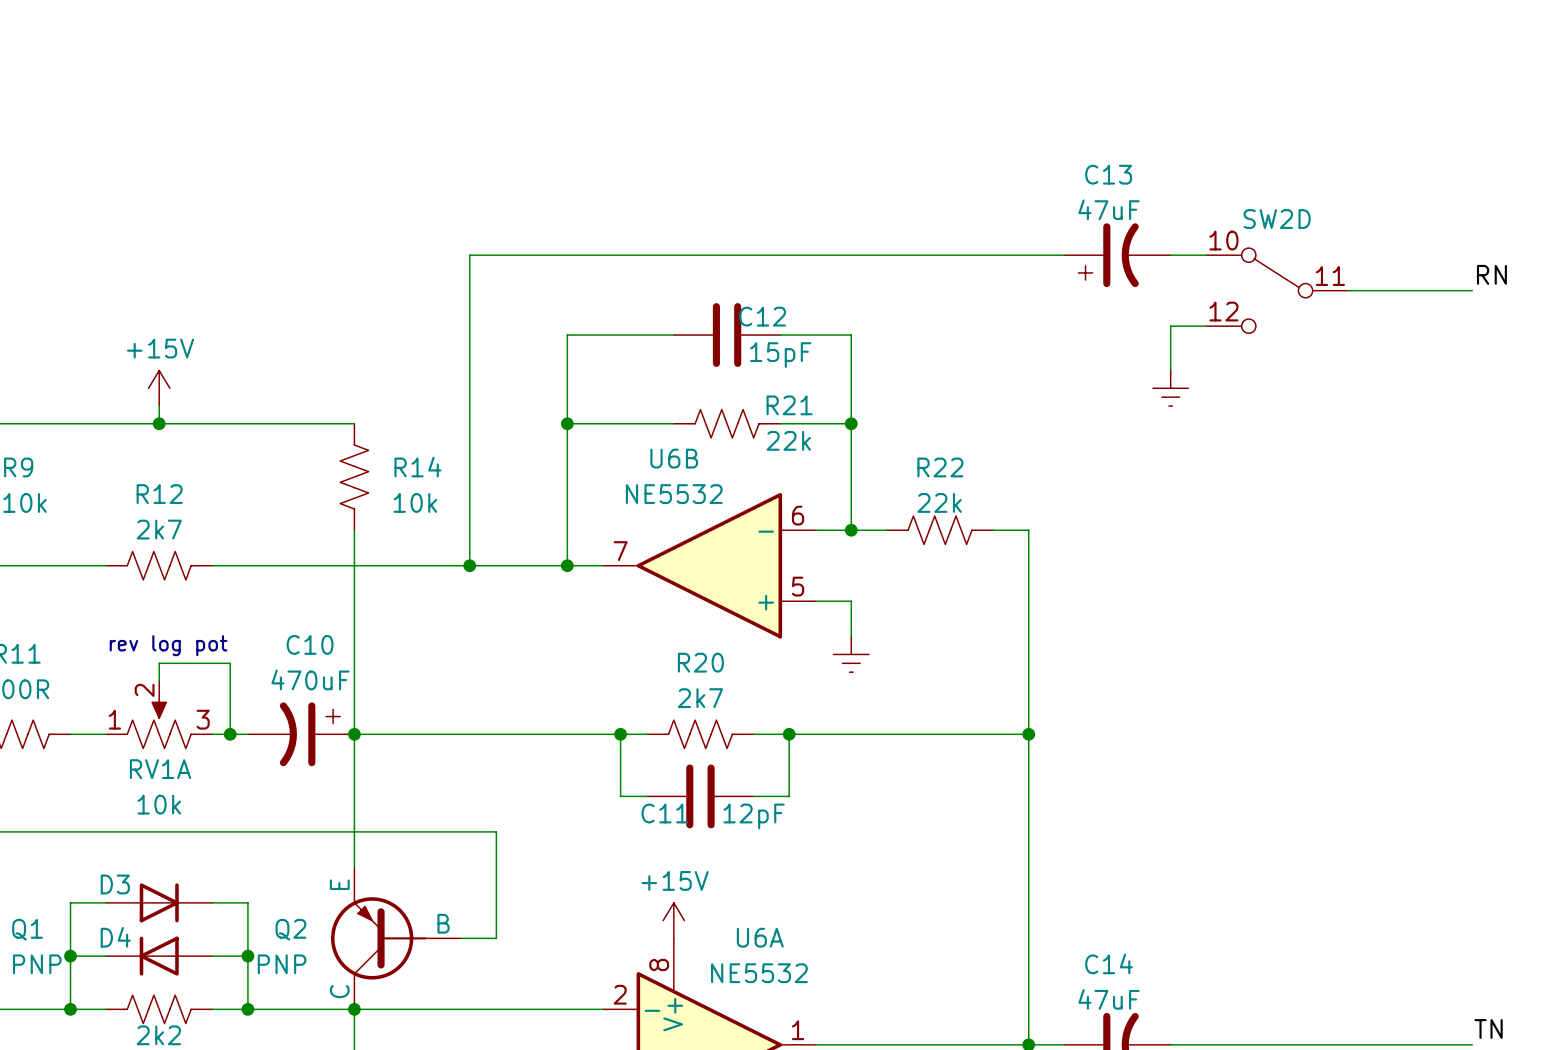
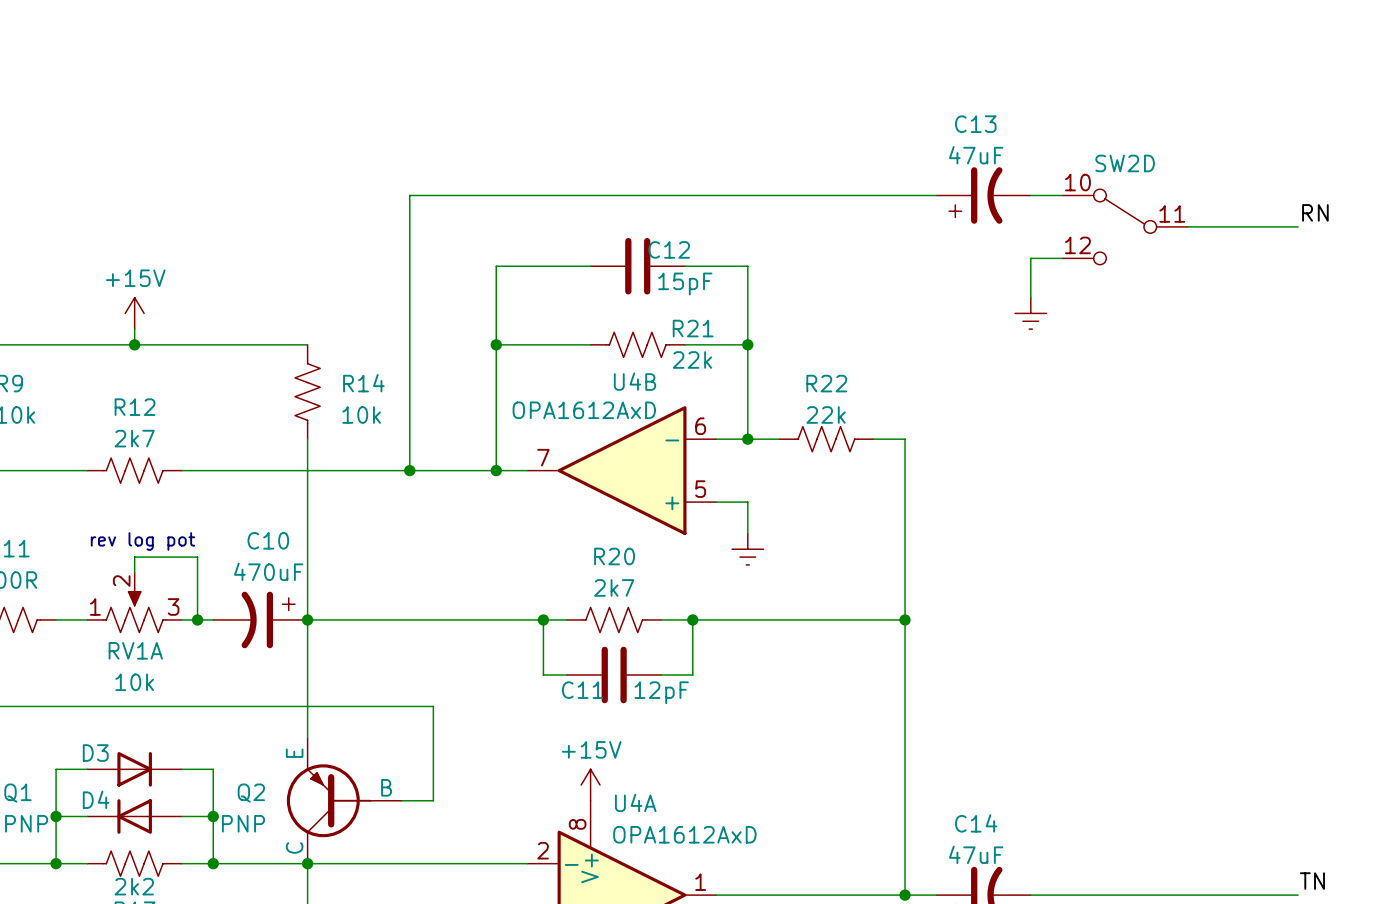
U6B name: U6B (674, 458) -> U4B (634, 381)
U6B value: NE5532 (674, 494) -> OPA1612AxD (584, 410)
U6A name: U6A (760, 937) -> U4A (635, 802)
U6A value: NE5532 (759, 973) -> OPA1612AxD (684, 834)

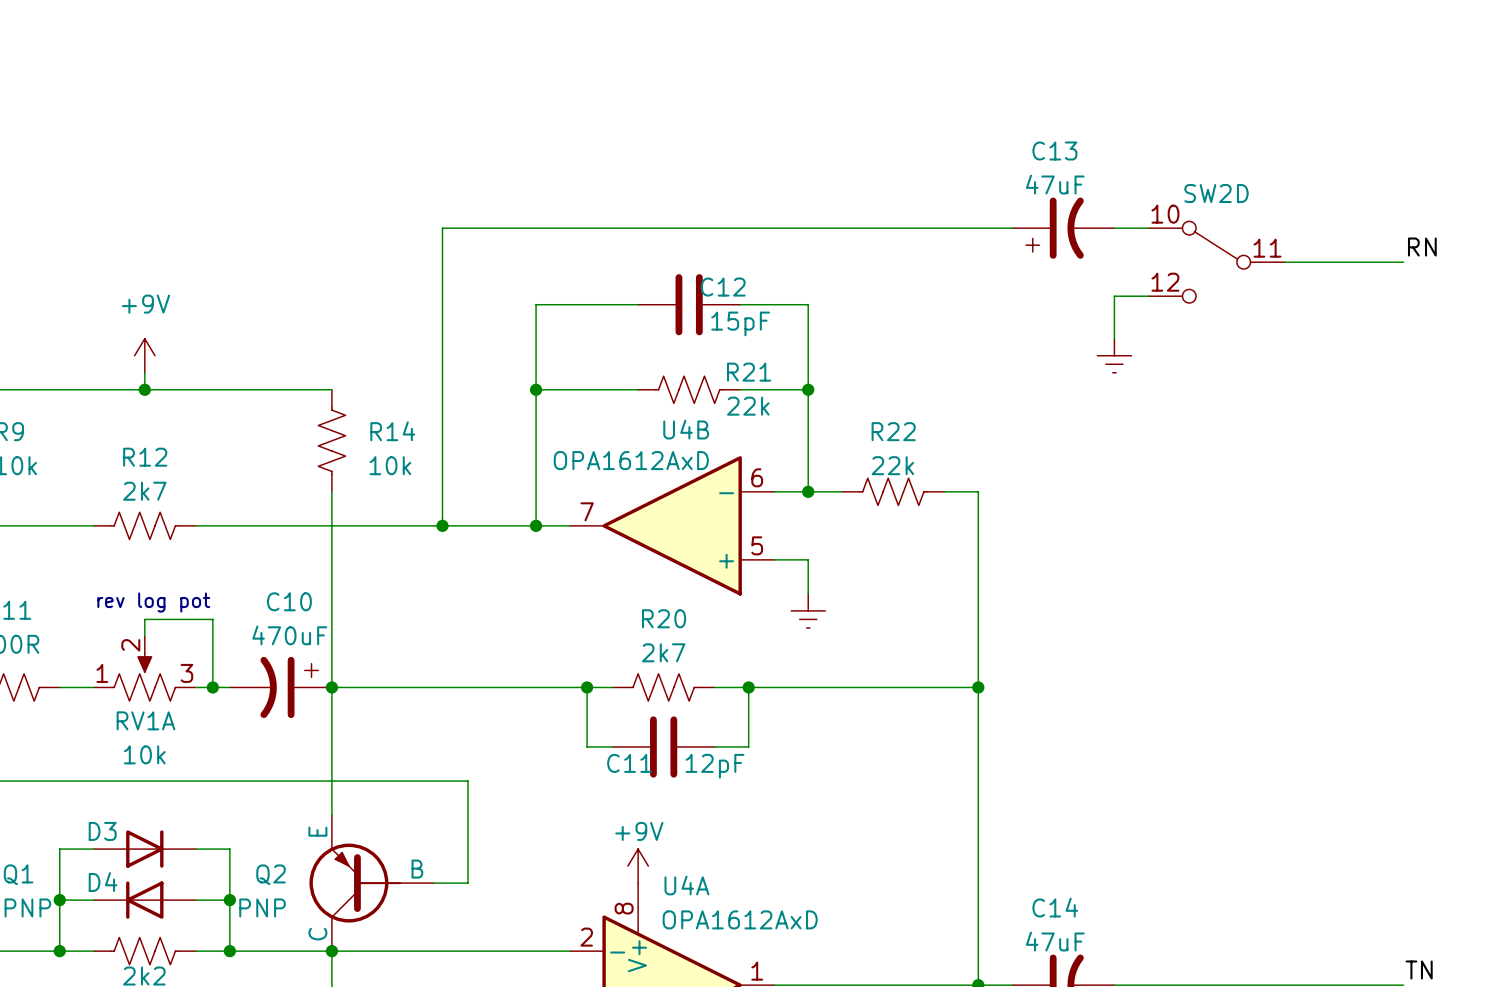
power symbol: +15V (134, 313) -> +9V (144, 355)
power symbol: +15V (590, 785) -> +9V (638, 866)

